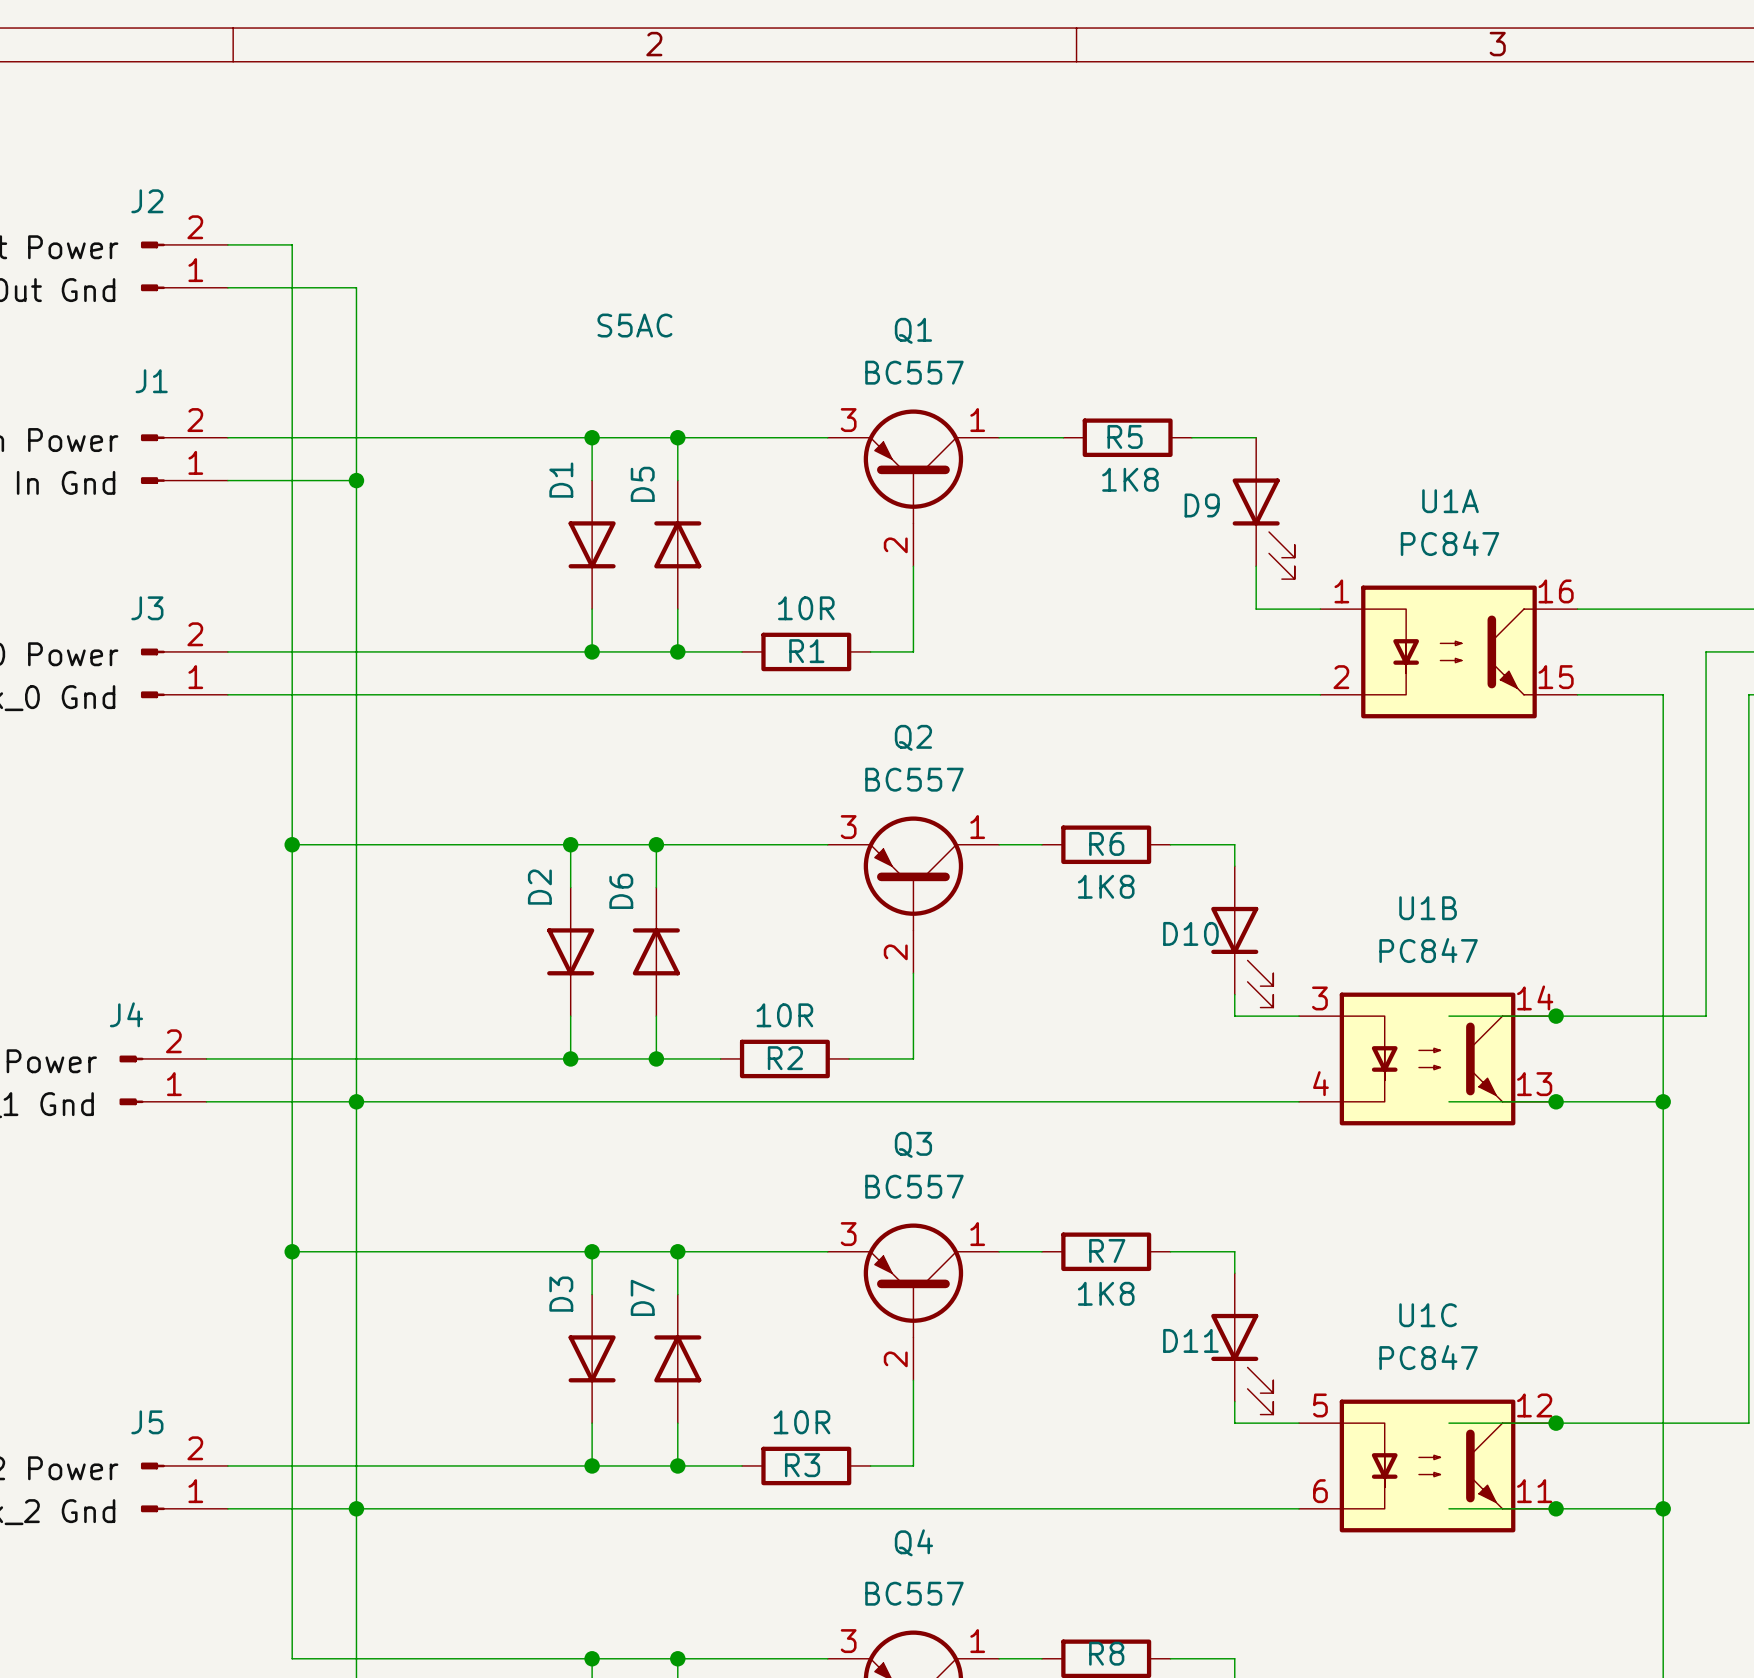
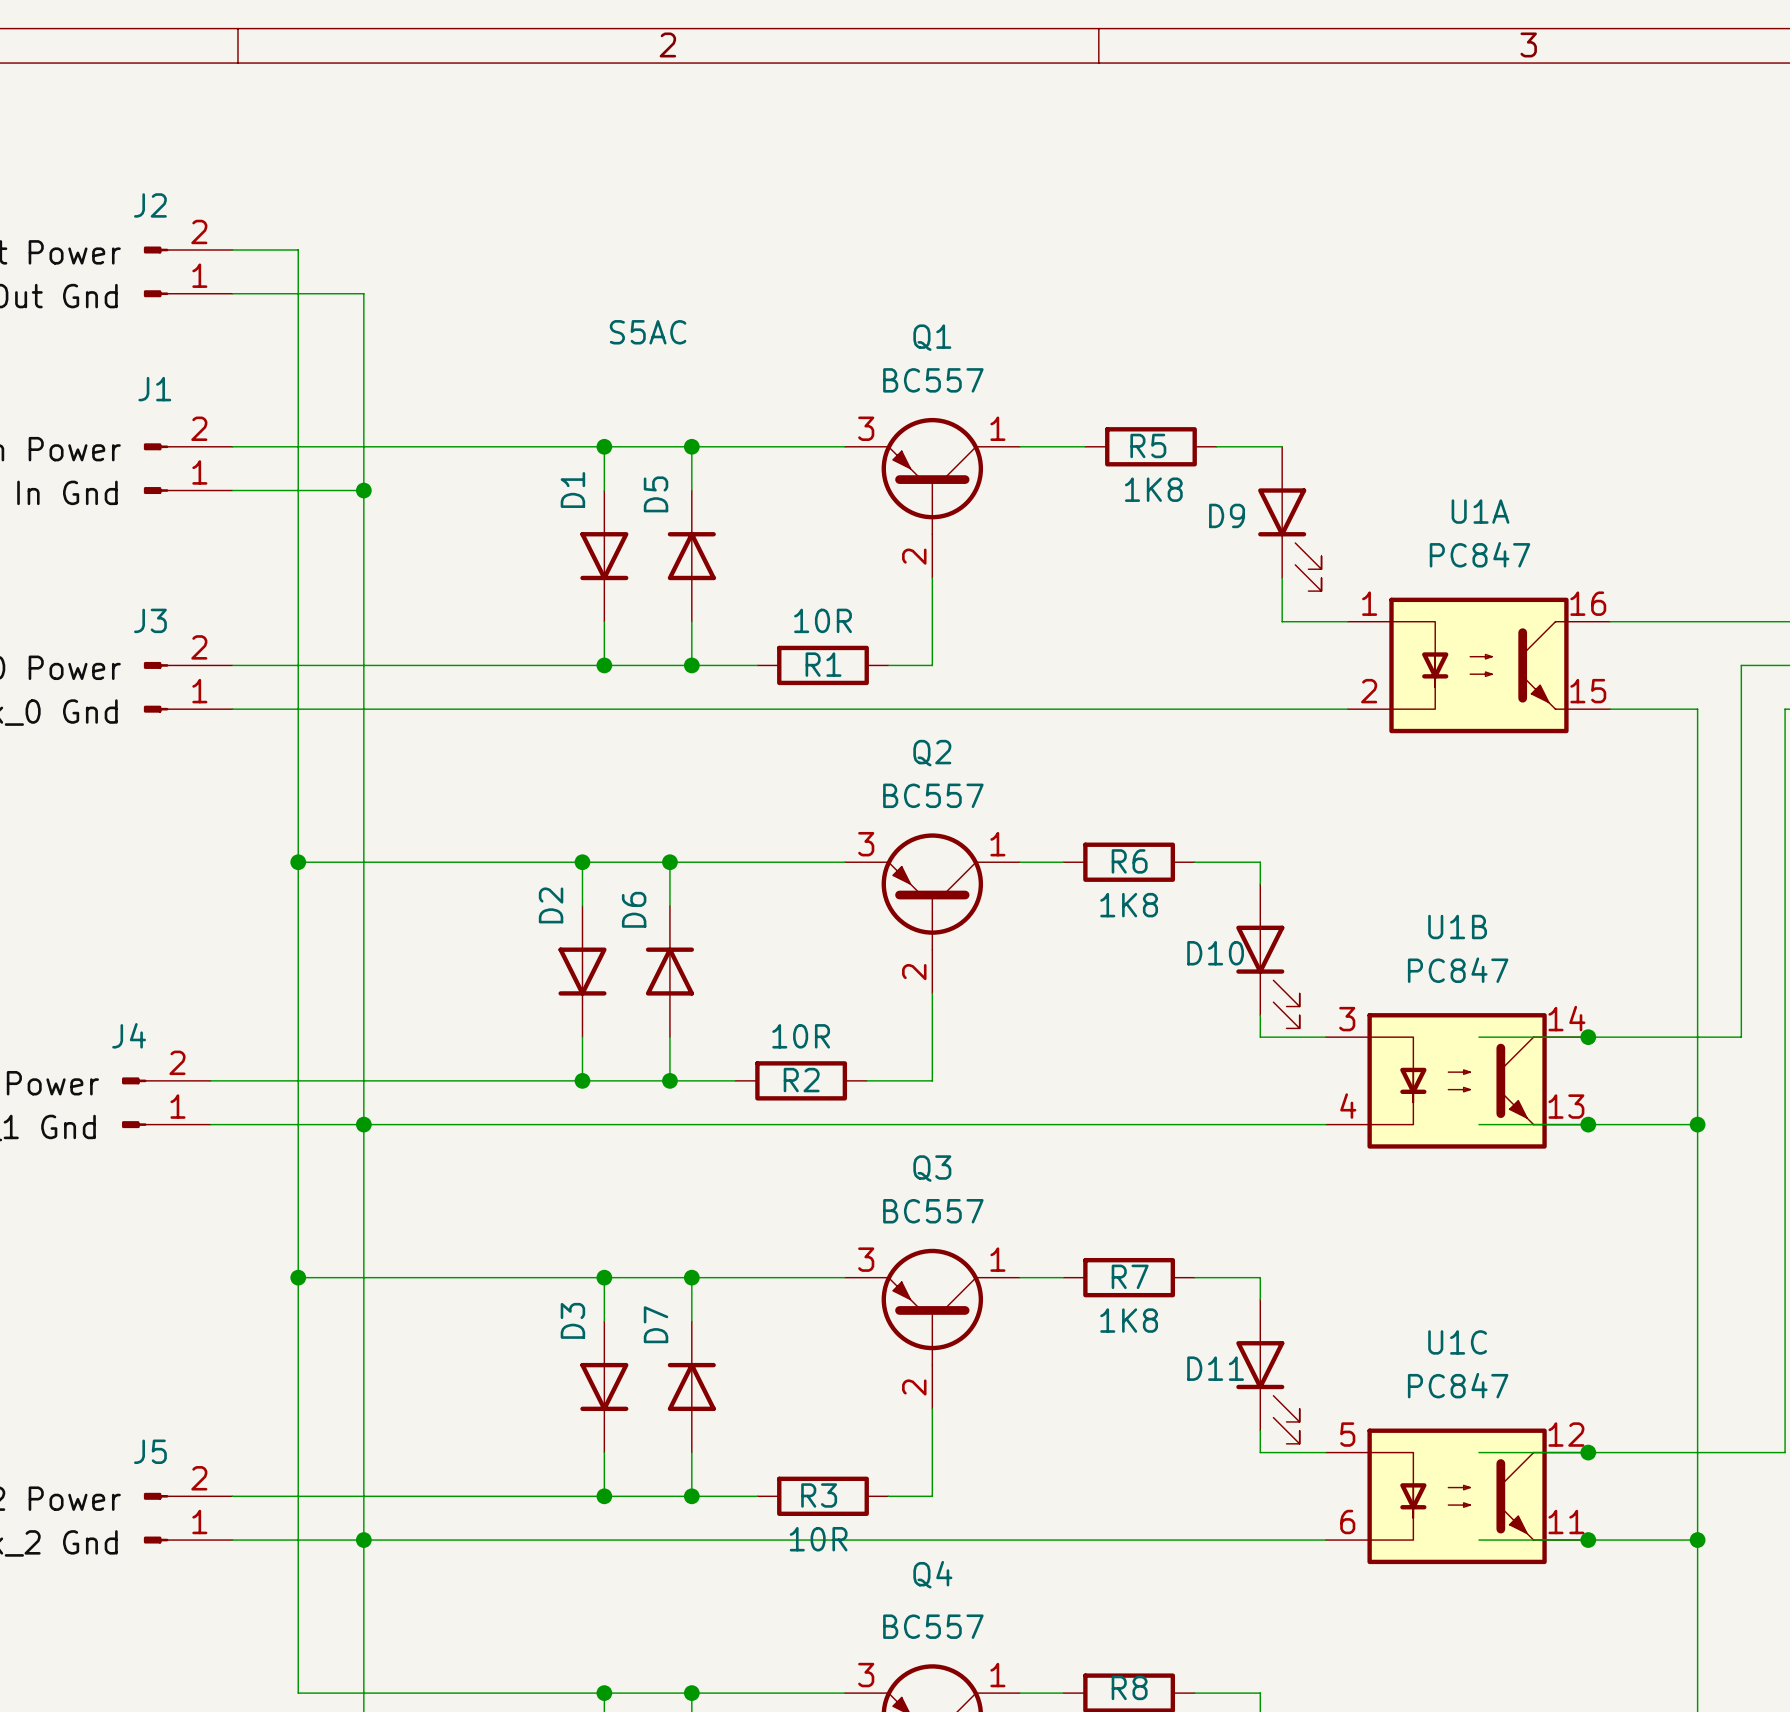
R3 value position: 10R (802, 1422) -> 10R (818, 1539)

